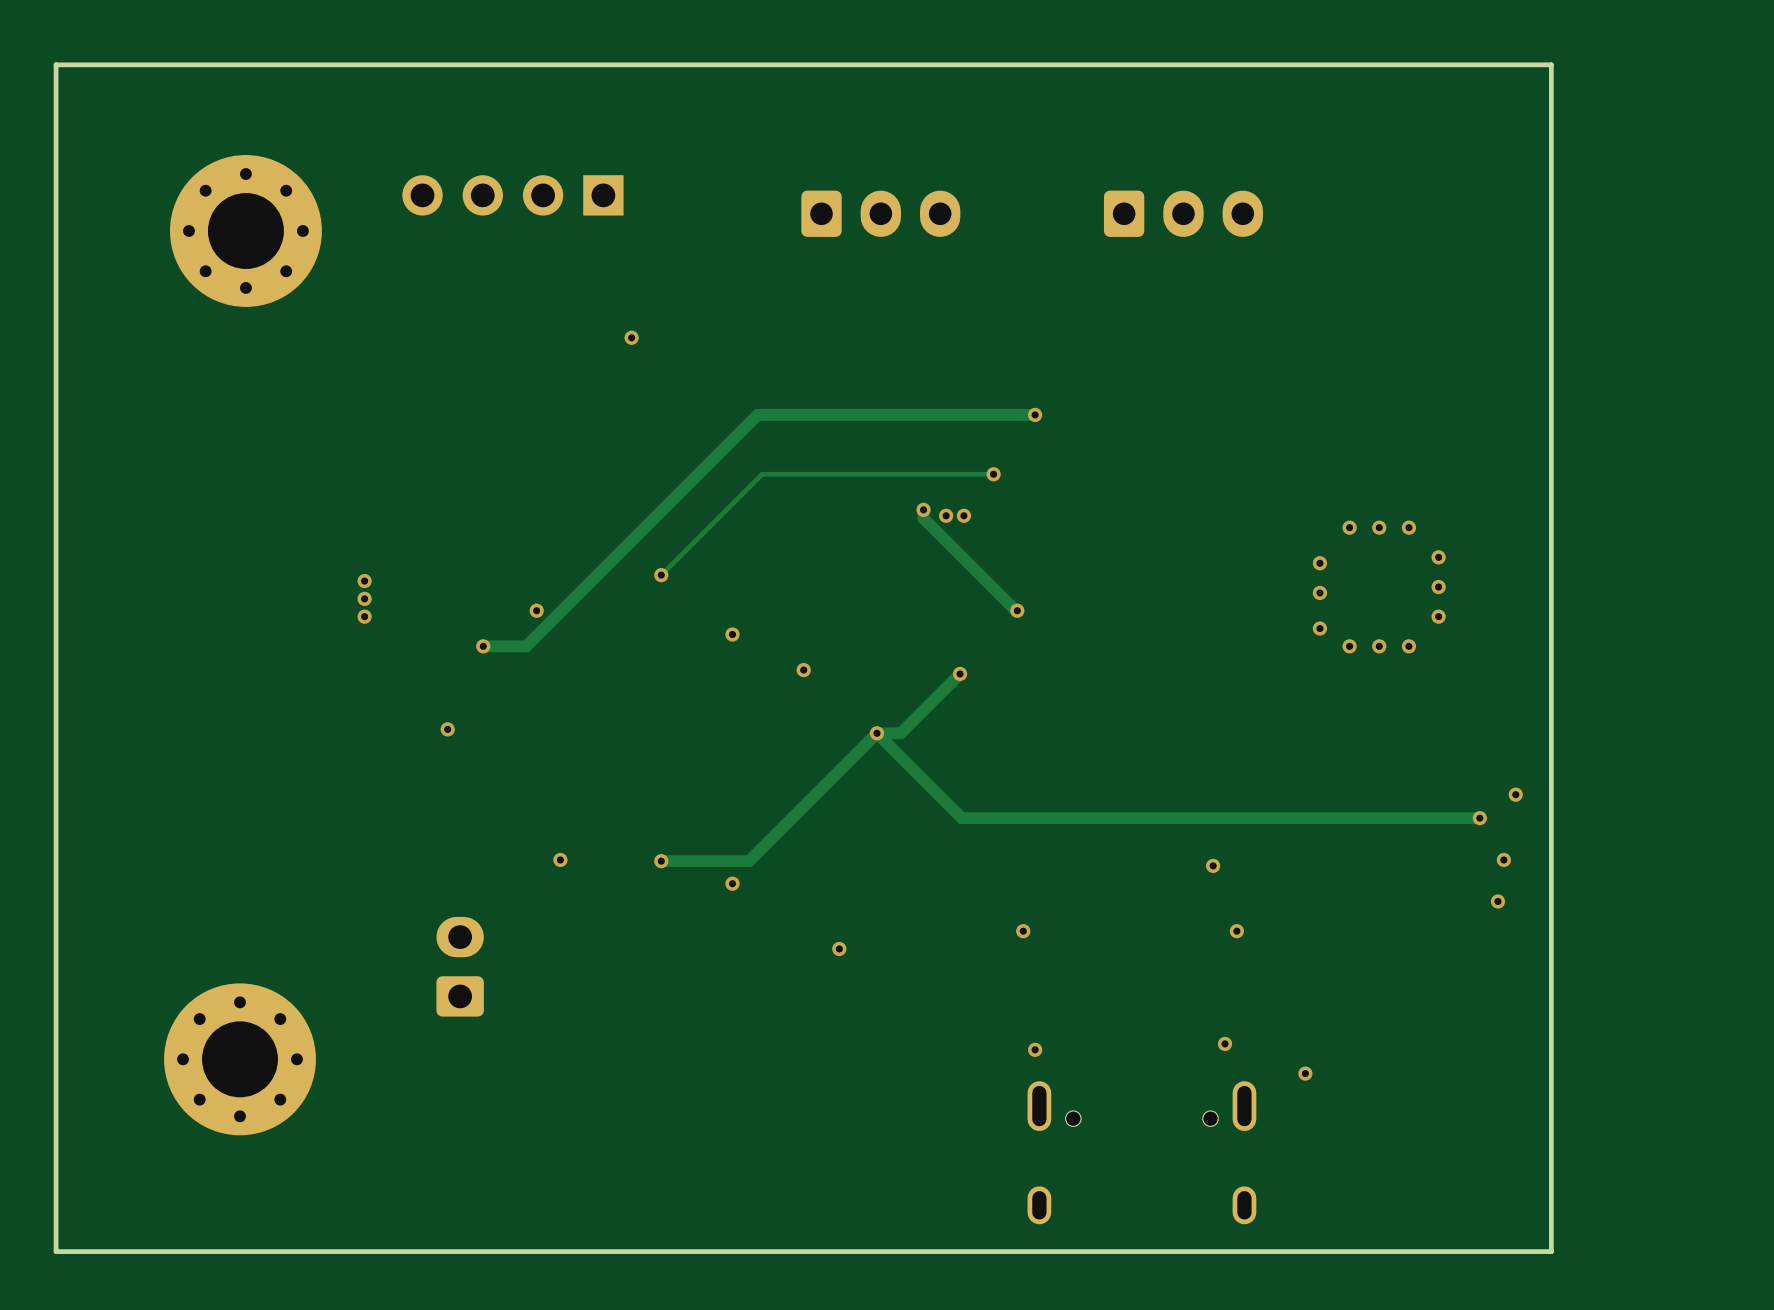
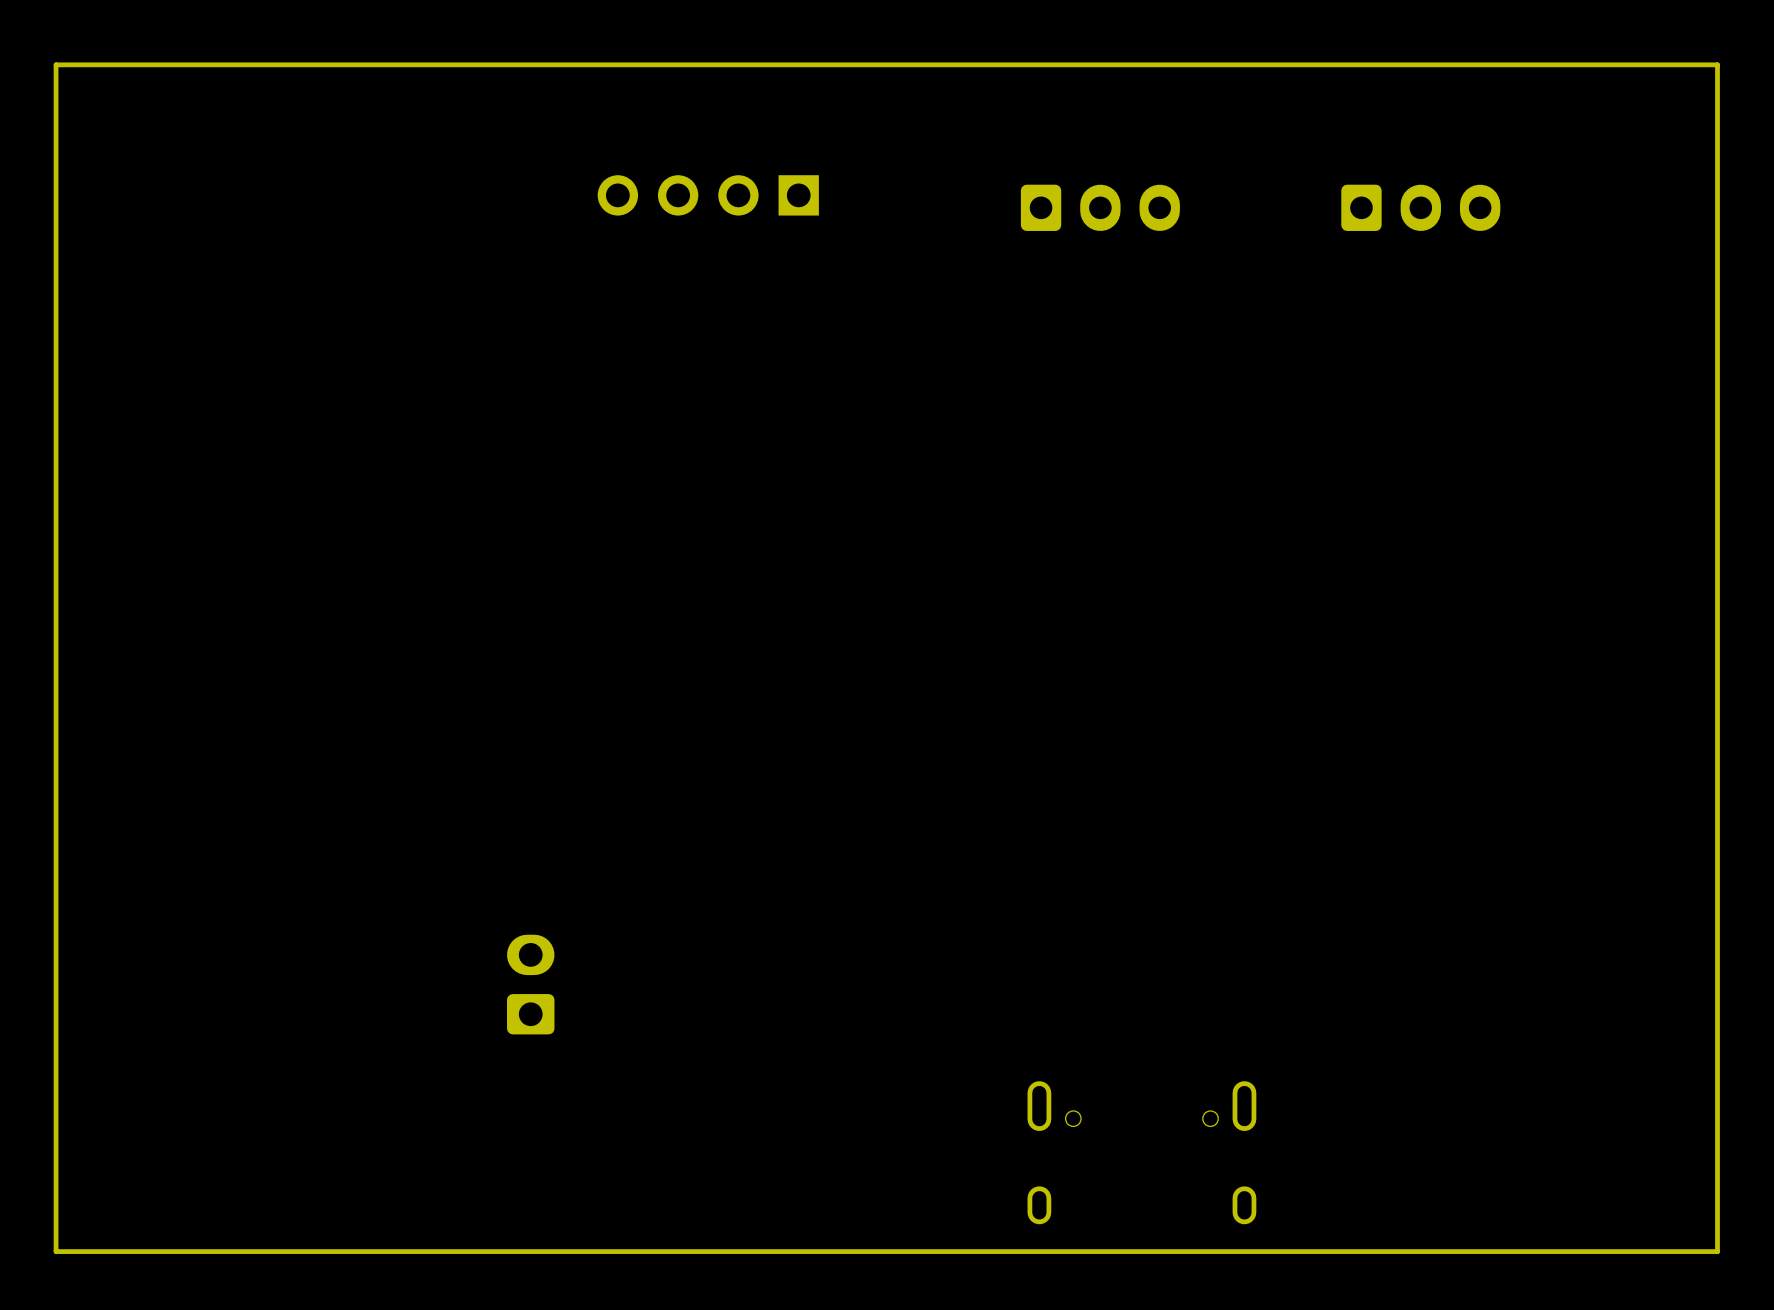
board edge: (1551, 64) (1551, 1251) -> (1551, 64) (1717, 64) (1717, 1251) (1551, 1251)
part position: (512, 195) -> (708, 195)
part: none -> (1420, 207)
part: (880, 213) -> none
part position: (1183, 213) -> (1100, 207)
part: (245, 230) -> none
via: (631, 337) -> none
track: (1035, 414) (757, 414) (526, 646) (483, 646) -> none
via: (1035, 414) -> none
track: (993, 474) (762, 474) (661, 575) -> none
via: (993, 474) -> none
track: (923, 509) (923, 518) (1017, 610) -> none
via: (923, 509) -> none
via: (946, 515) -> none
via: (963, 515) -> none
via: (1349, 527) -> none
via: (1379, 527) -> none
via: (1408, 527) -> none
via: (1438, 557) -> none
via: (1319, 563) -> none
via: (661, 575) -> none
via: (364, 581) -> none
via: (1438, 587) -> none
via: (1319, 592) -> none
via: (364, 598) -> none
via: (536, 610) -> none
via: (1017, 610) -> none
via: (364, 616) -> none
via: (1438, 616) -> none
via: (1319, 628) -> none
via: (732, 634) -> none
via: (483, 646) -> none
via: (1349, 646) -> none
via: (1379, 646) -> none
via: (1408, 646) -> none
via: (803, 670) -> none
track: (960, 673) (900, 733) (876, 733) -> none
via: (960, 673) -> none
via: (447, 729) -> none
track: (876, 733) (749, 861) (661, 861) -> none
track: (876, 733) (961, 818) (1479, 818) -> none
via: (876, 733) -> none
via: (1515, 794) -> none
via: (1479, 818) -> none
via: (560, 859) -> none
via: (1503, 859) -> none
via: (661, 861) -> none
via: (1213, 865) -> none
via: (732, 883) -> none
via: (1497, 901) -> none
via: (1023, 931) -> none
via: (1236, 931) -> none
via: (839, 948) -> none
part position: (460, 966) -> (530, 984)
via: (1225, 1043) -> none
via: (1035, 1049) -> none
part: (240, 1059) -> none
via: (1305, 1073) -> none

